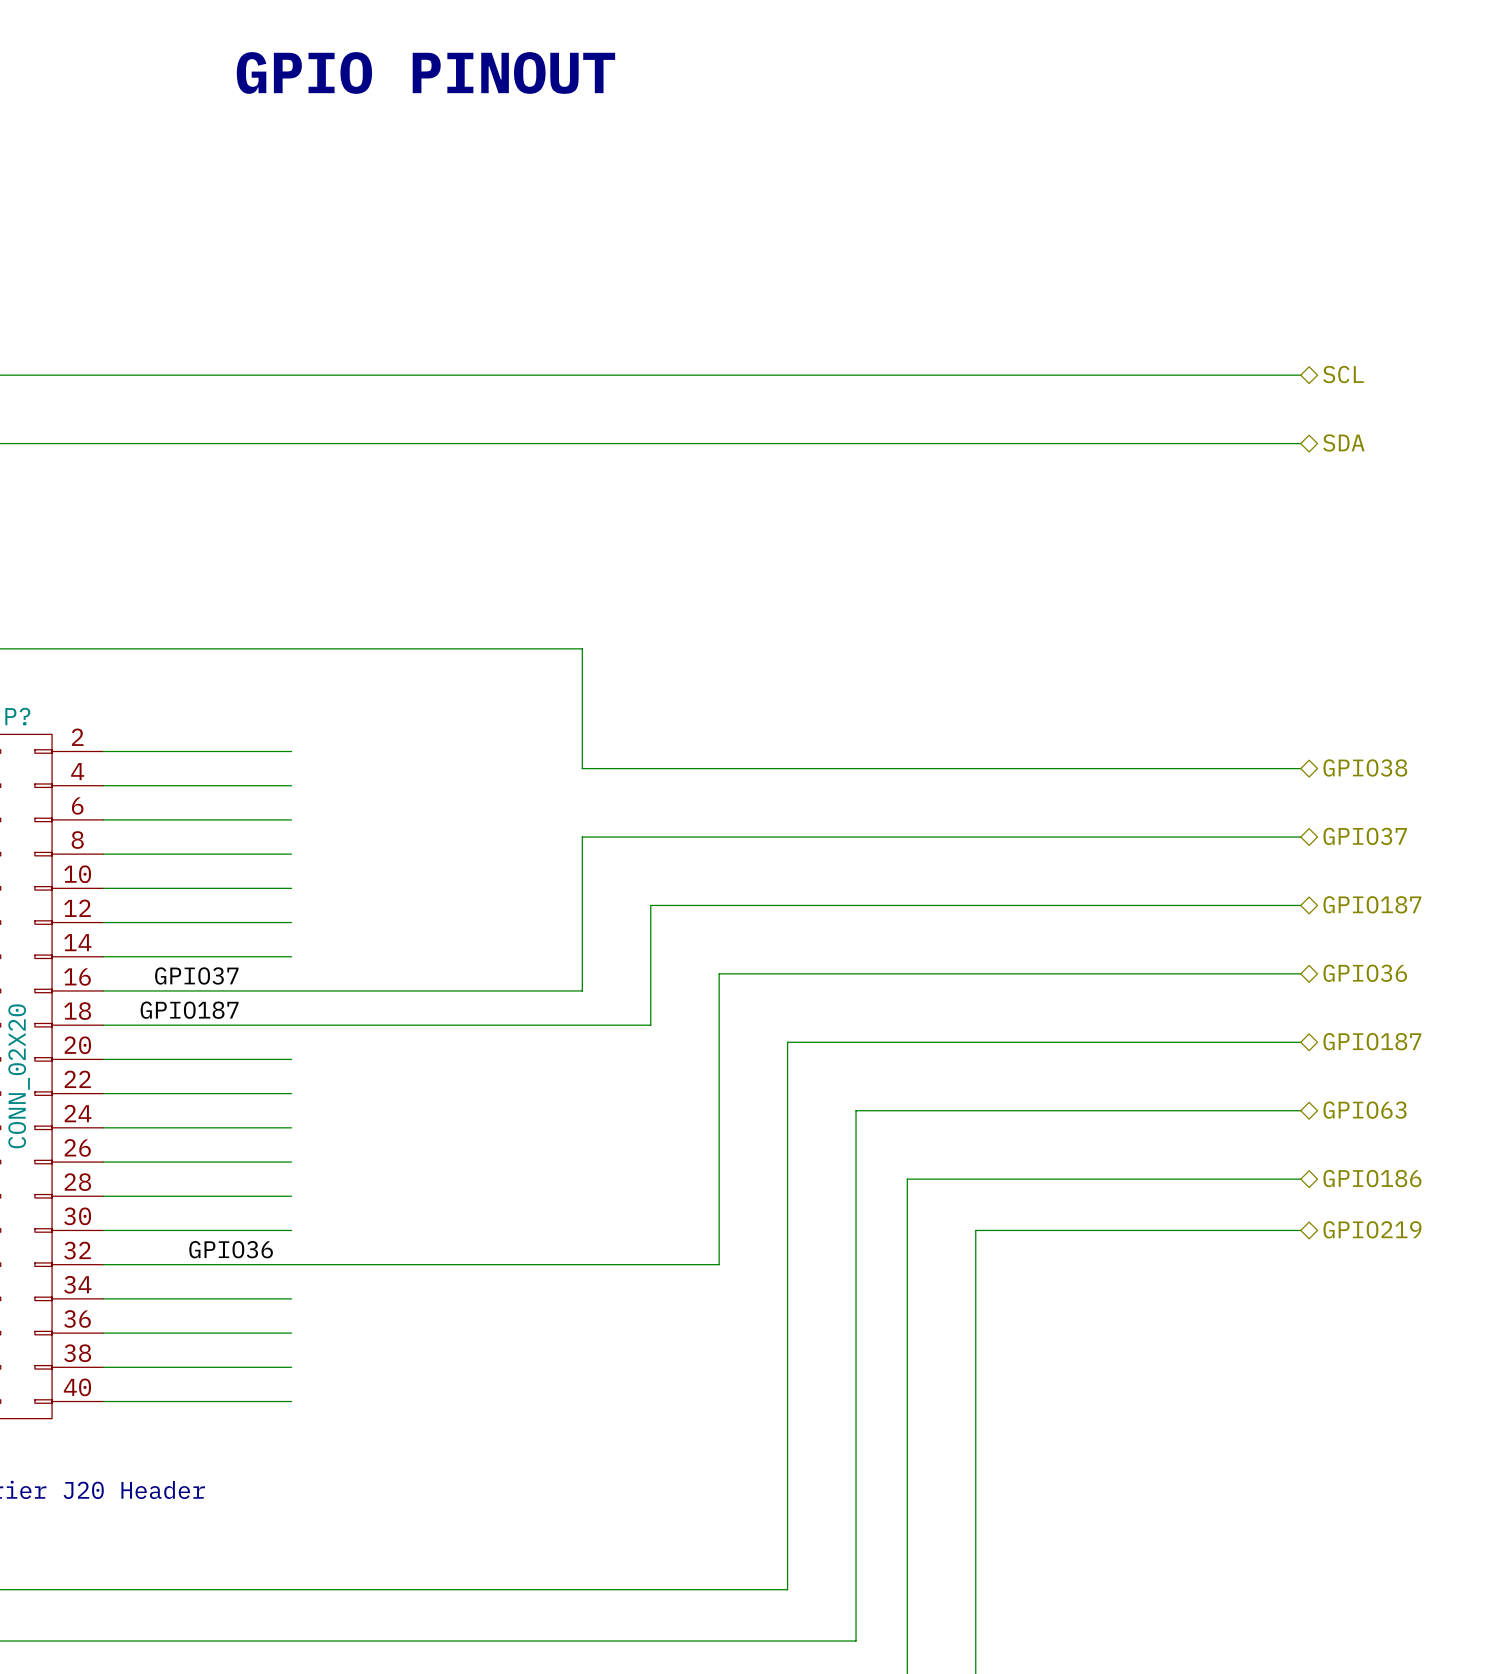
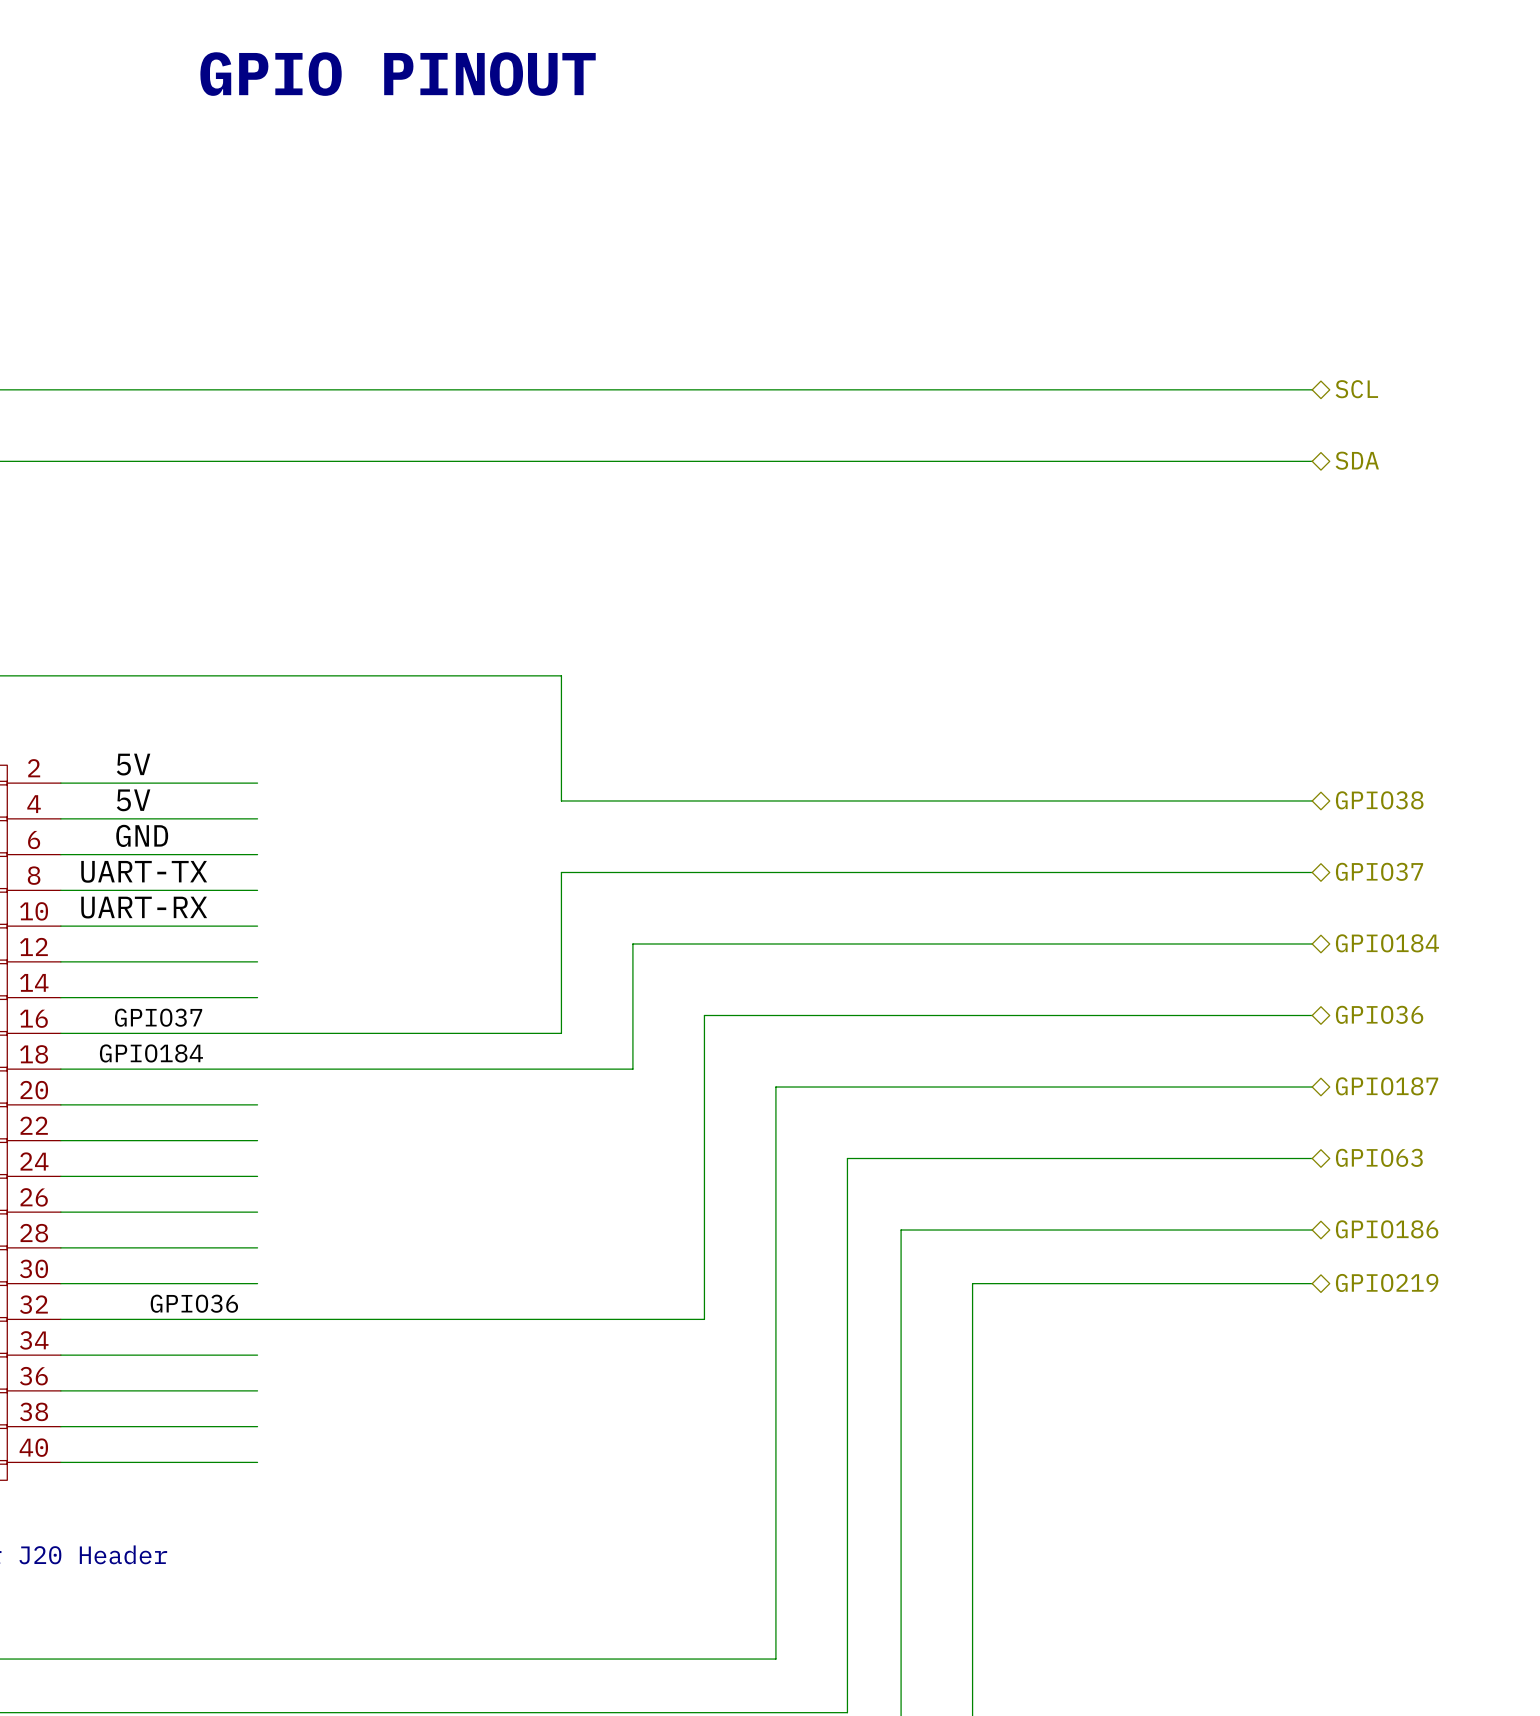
label: none -> 5V (133, 764)
label: none -> 5V (133, 800)
label: none -> GND (142, 835)
label: none -> UART-TX (144, 871)
label: none -> UART-RX (144, 907)
hierarchical label: GPIO187 (1372, 904) -> GPIO184 (1387, 943)
label: GPIO187 (189, 1010) -> GPIO184 (151, 1053)

